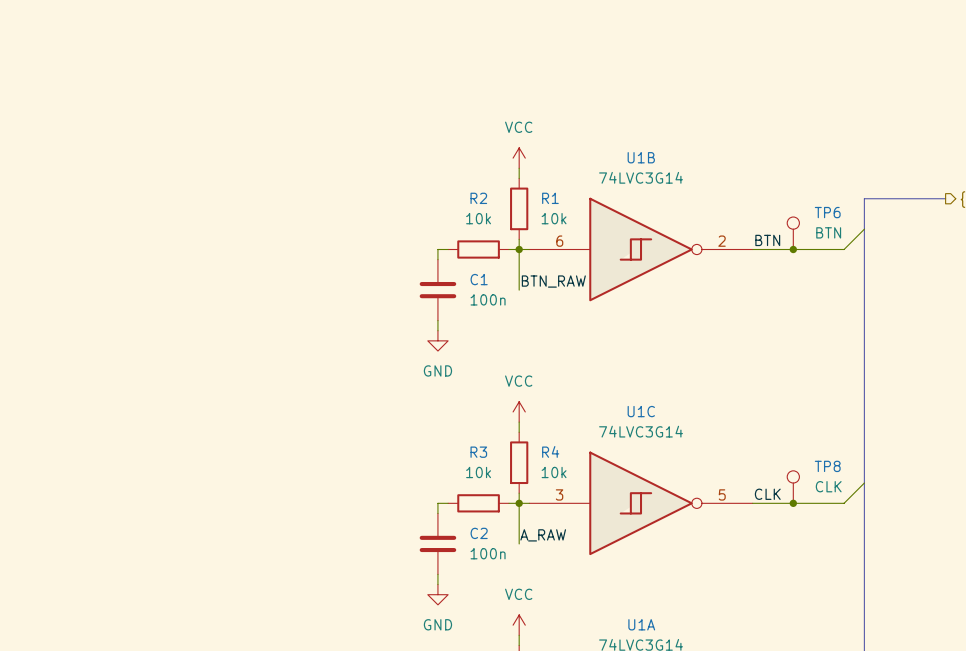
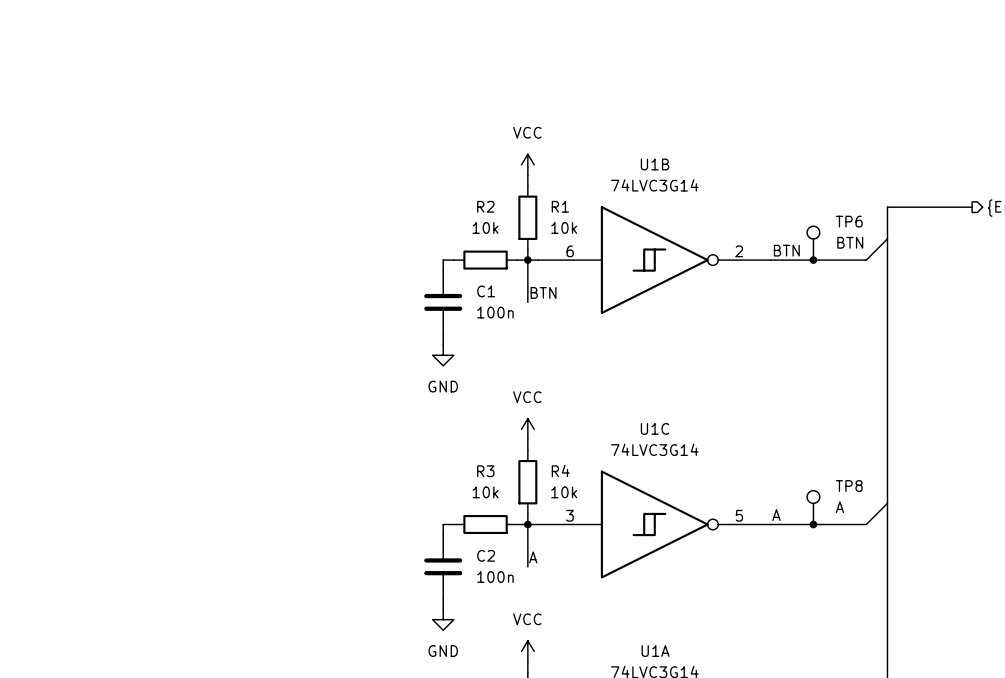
label: BTN_RAW (553, 281) -> BTN (543, 292)
TP8 value: CLK (828, 486) -> A (839, 507)
label: CLK (767, 494) -> A (776, 515)
label: A_RAW (543, 535) -> A (533, 557)

